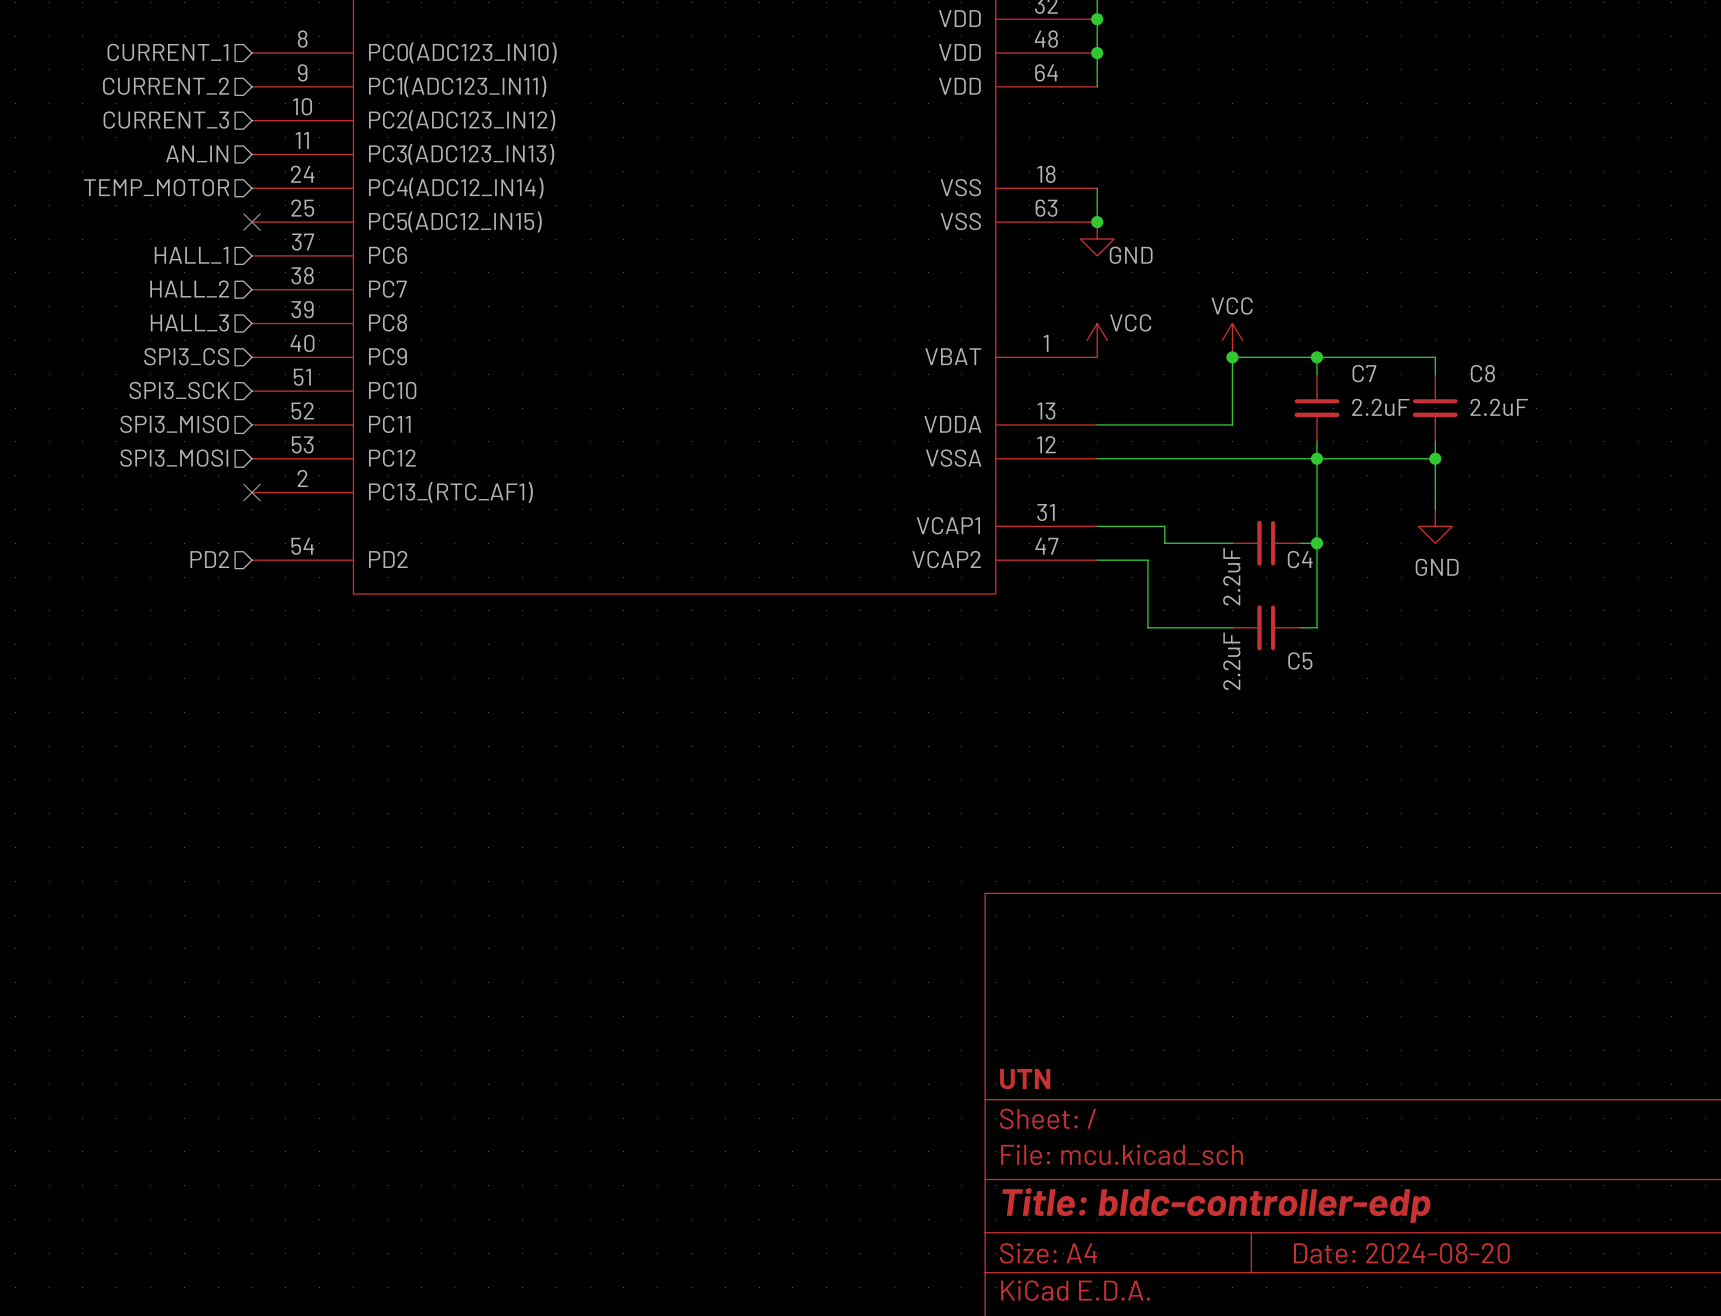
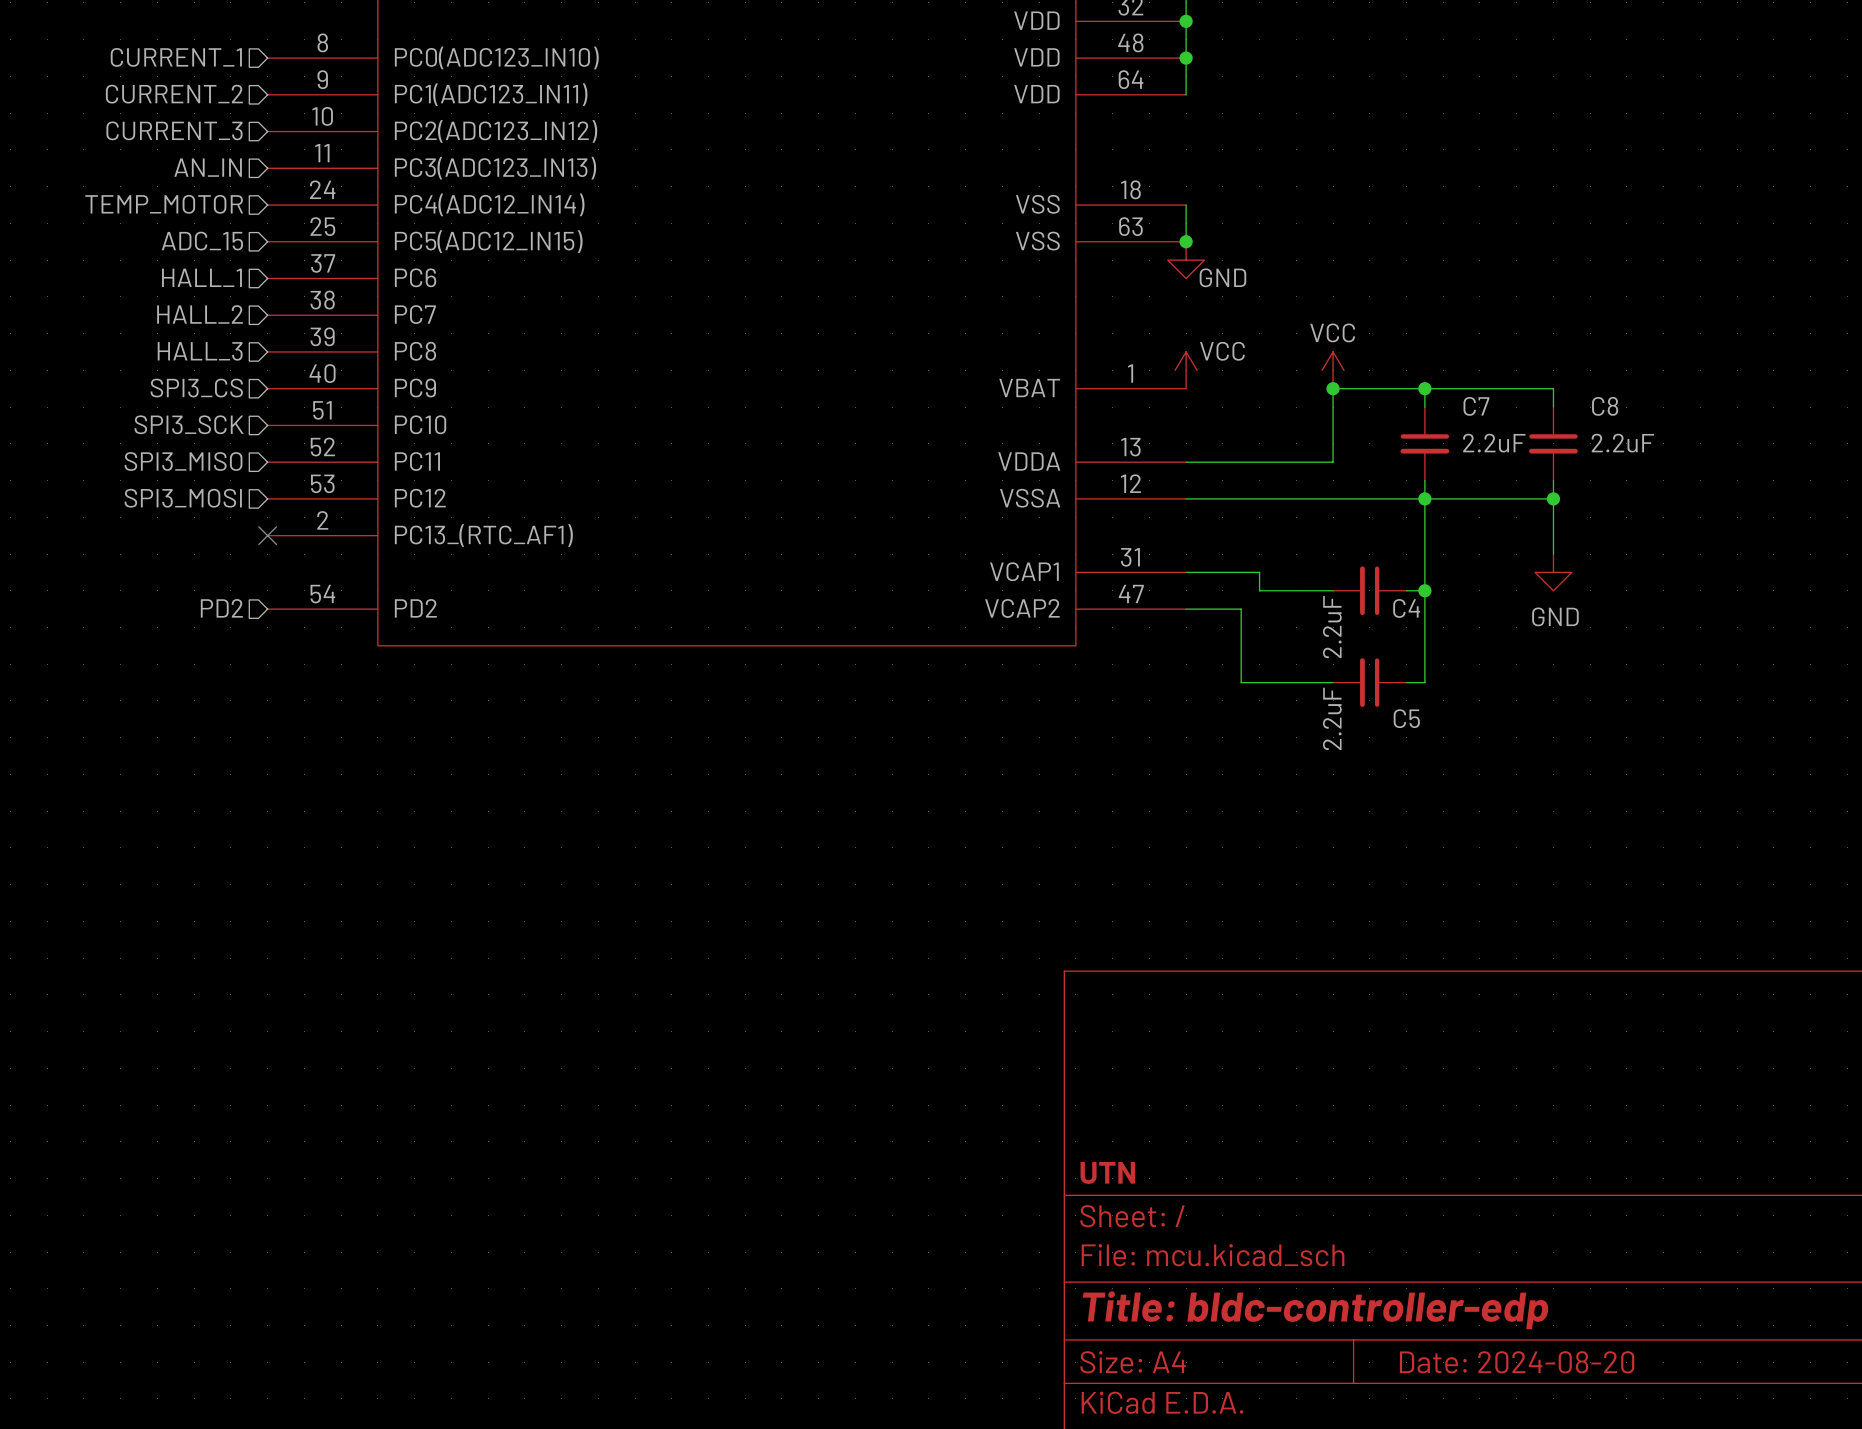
hierarchical label: none -> ADC_15 (202, 241)
no-connect mark: (251, 222) -> none

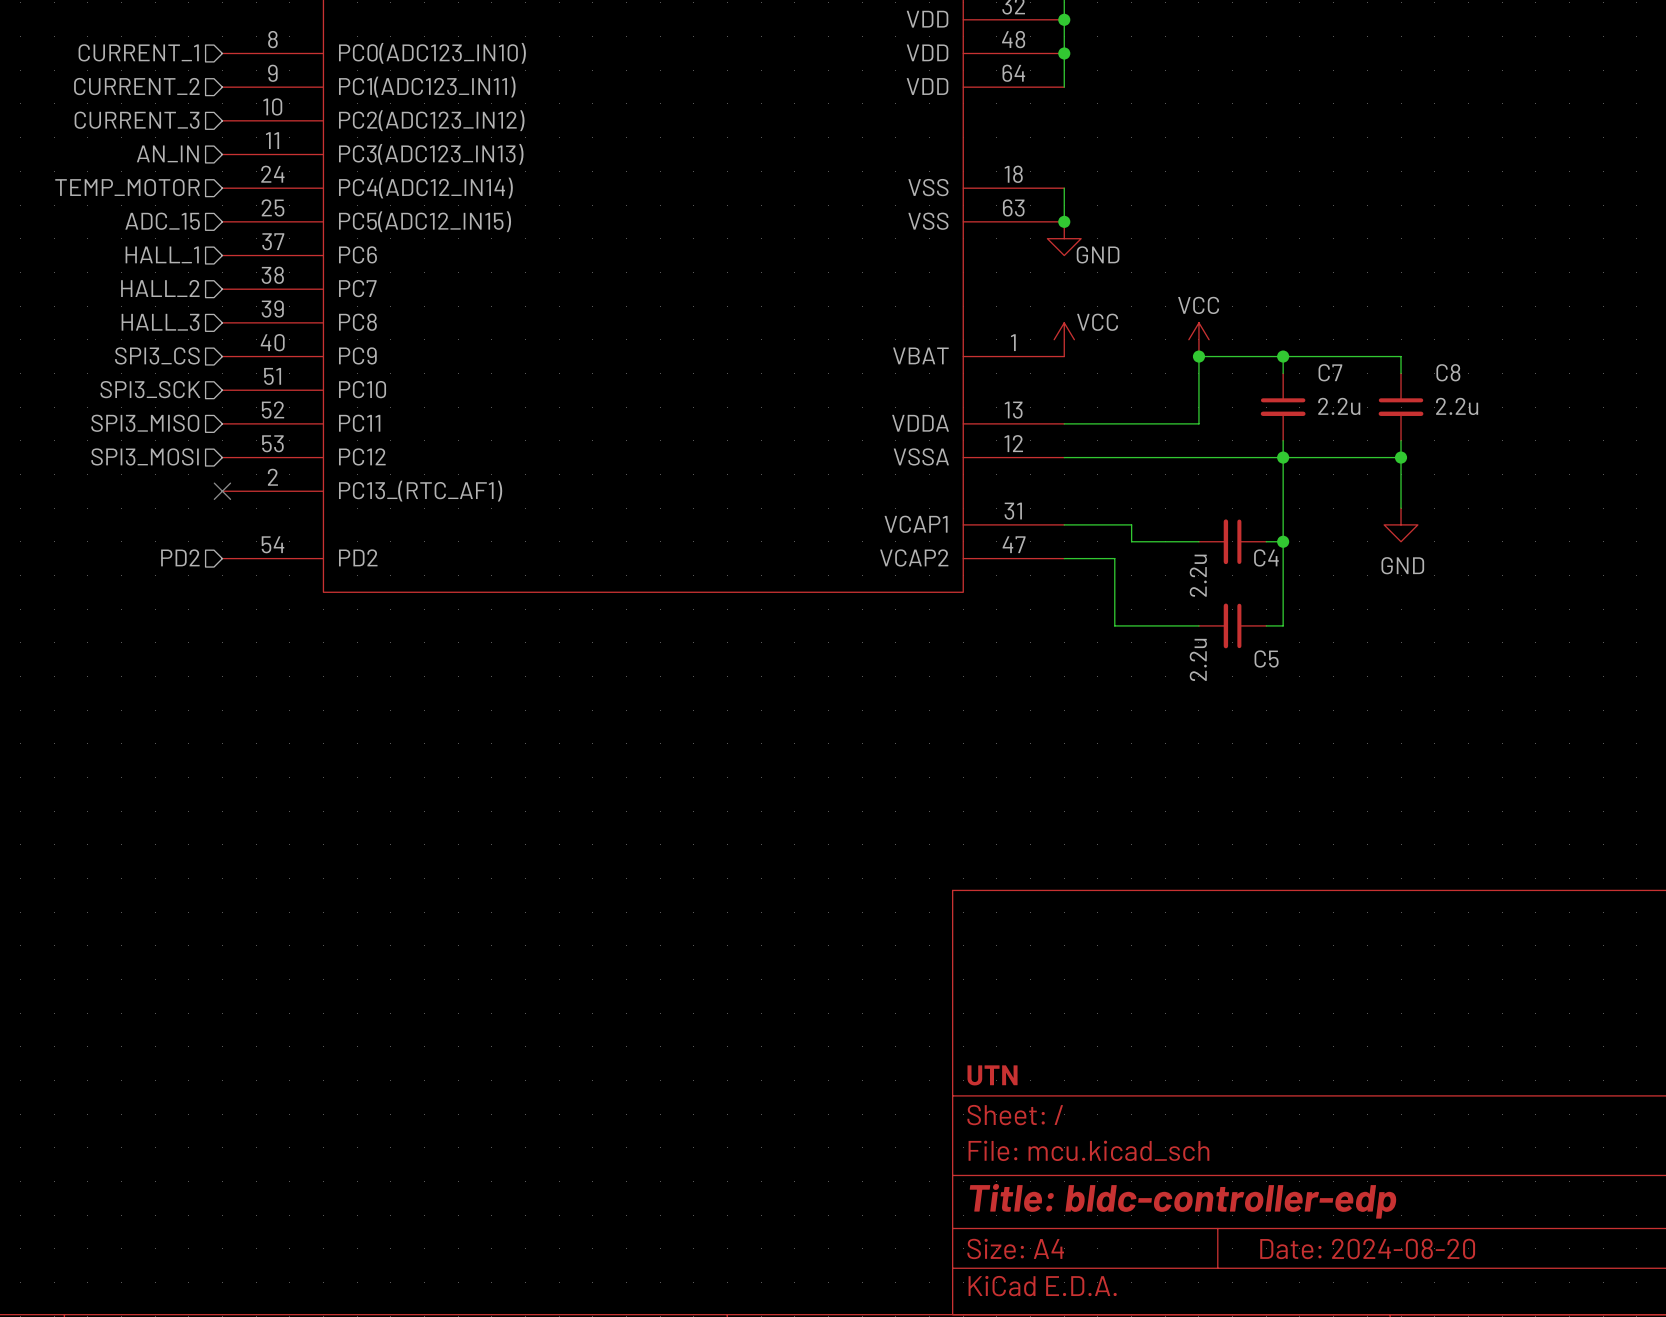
C7 value: 2.2uF (1494, 443) -> 2.2u (1339, 406)
C8 value: 2.2uF (1622, 443) -> 2.2u (1457, 406)
C4 value: 2.2uF (1332, 627) -> 2.2u (1198, 575)
C5 value: 2.2uF (1332, 718) -> 2.2u (1198, 659)

